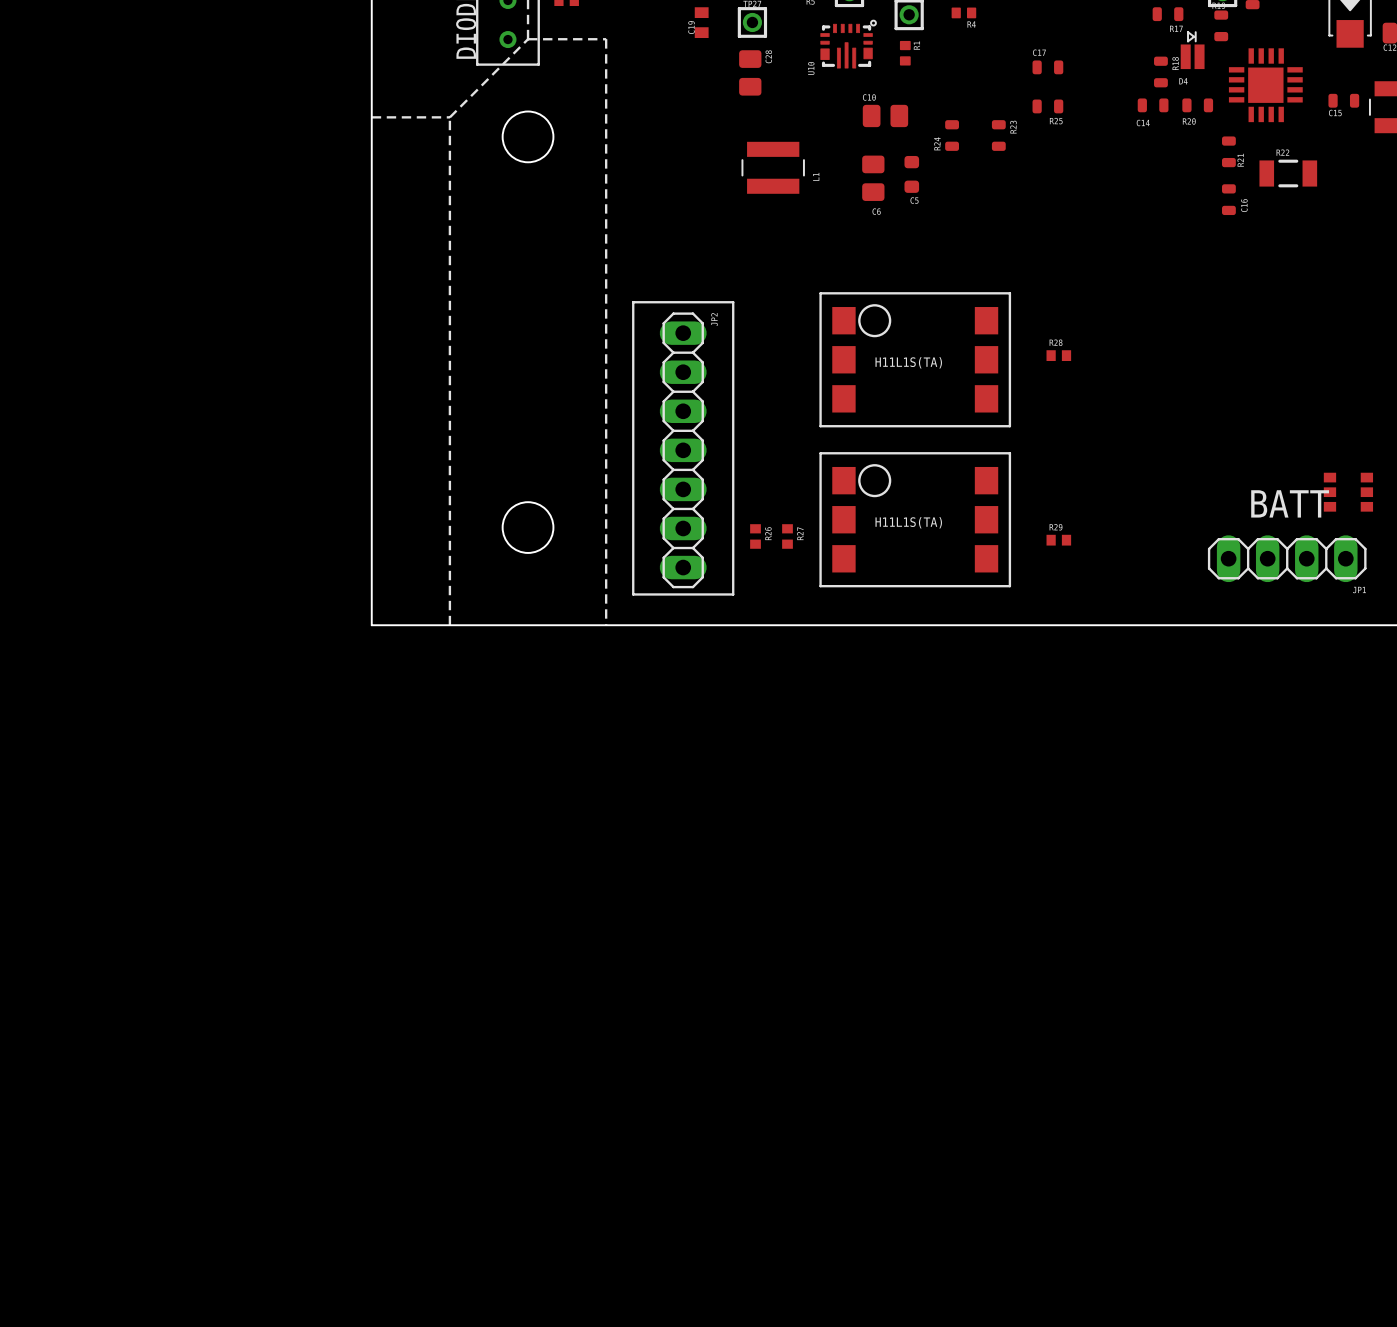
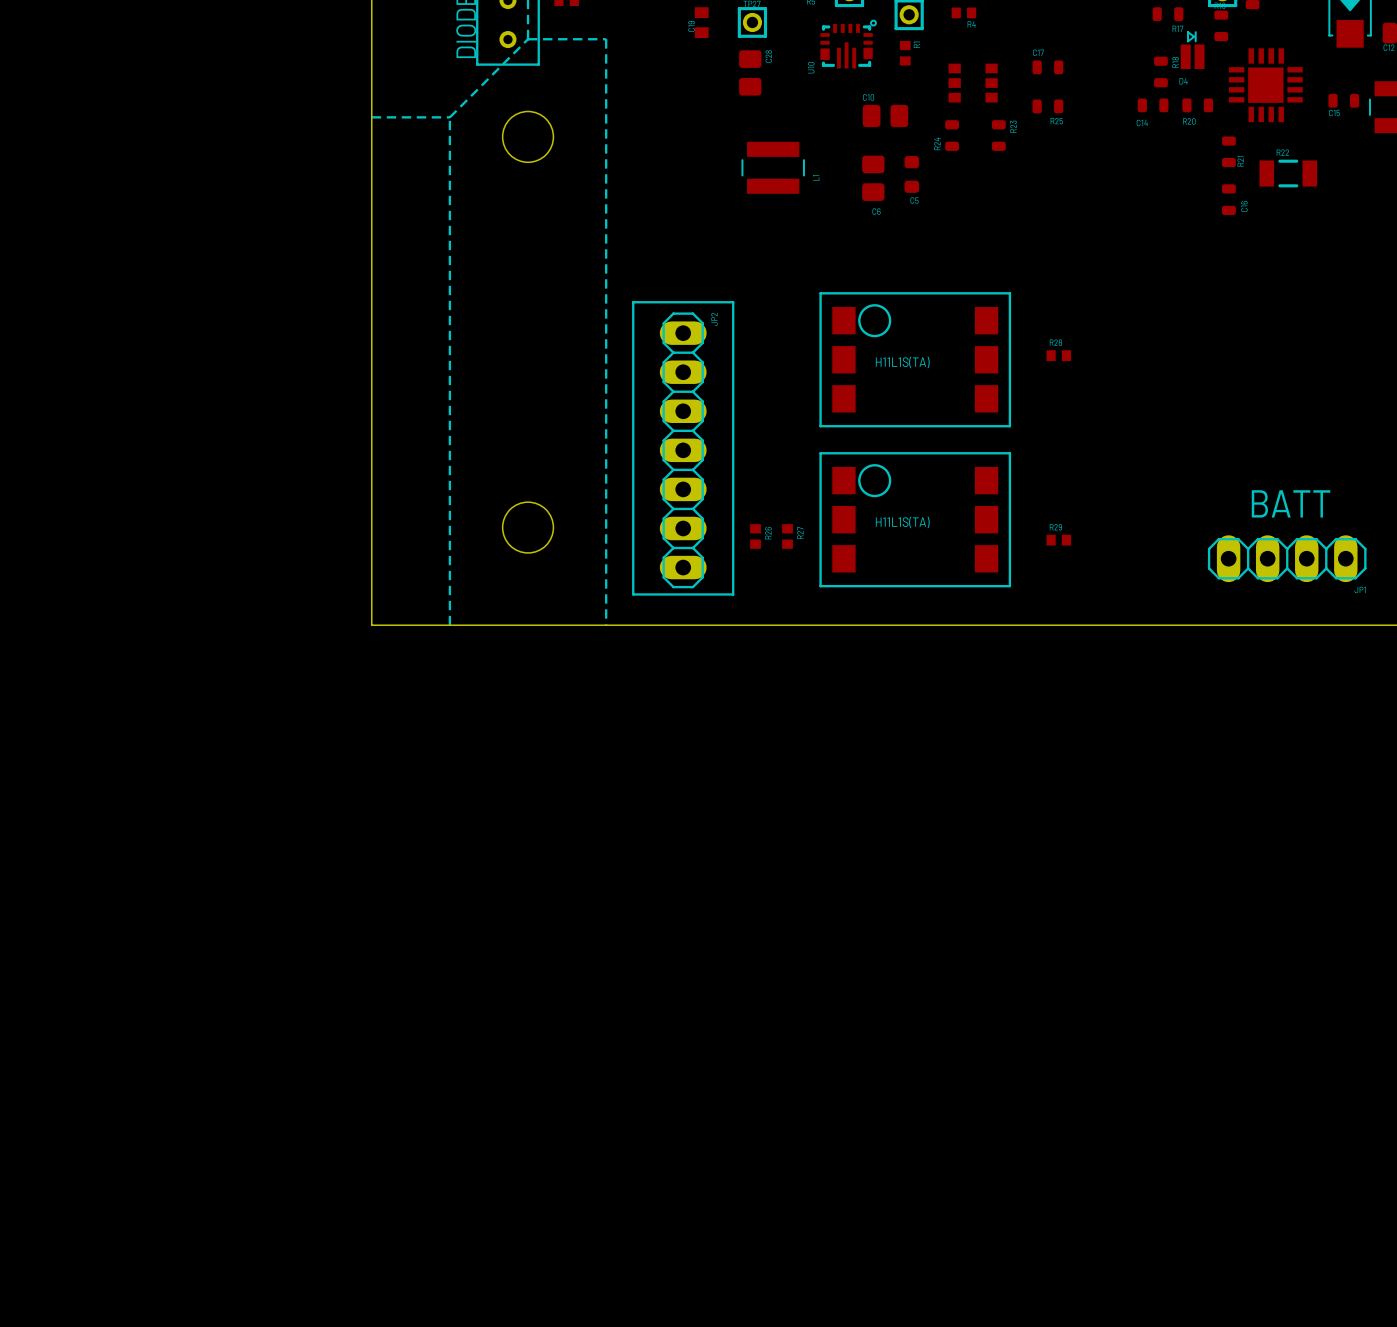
part: none -> (973, 83)
part: (1348, 492) -> none

